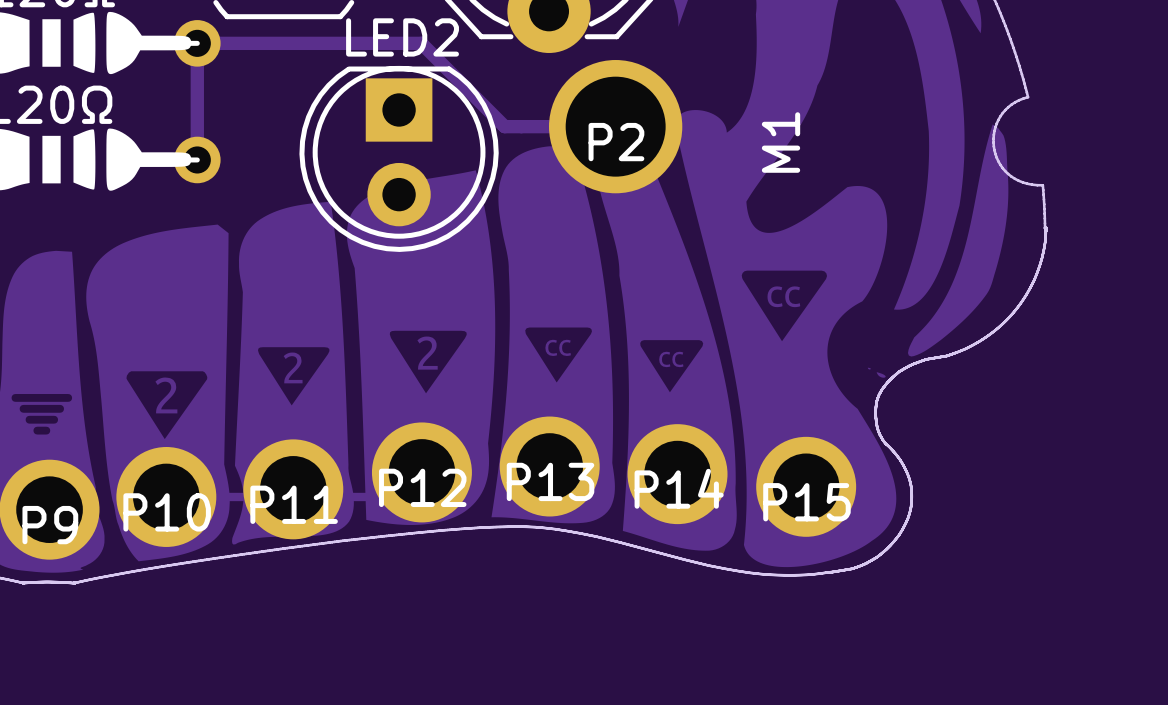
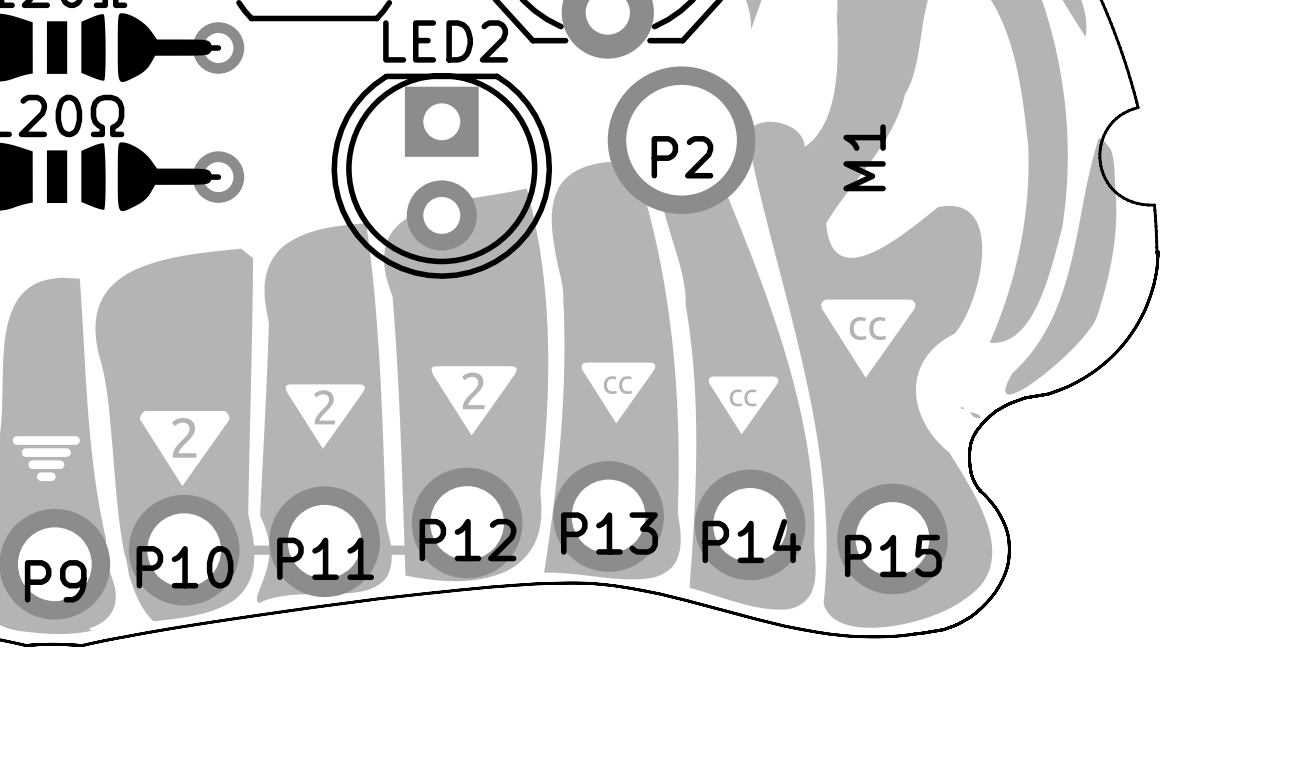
track: (615, 126) (504, 126) (421, 43) (197, 43) (197, 159) -> none

